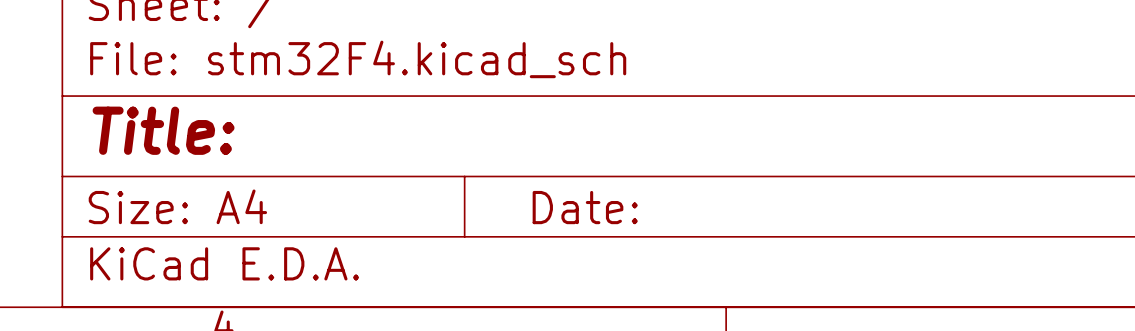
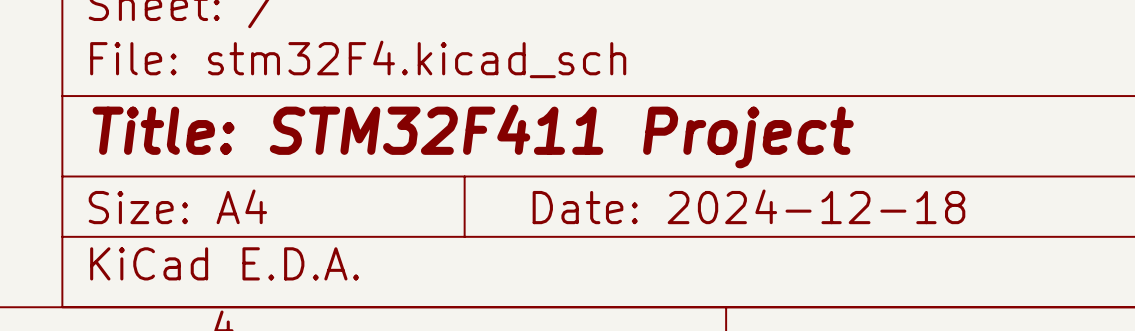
title block: Title: (163, 130) -> Title: STM32F411 Project (473, 136)
title block: Date: (585, 207) -> Date: 2024-12-18 (748, 206)

